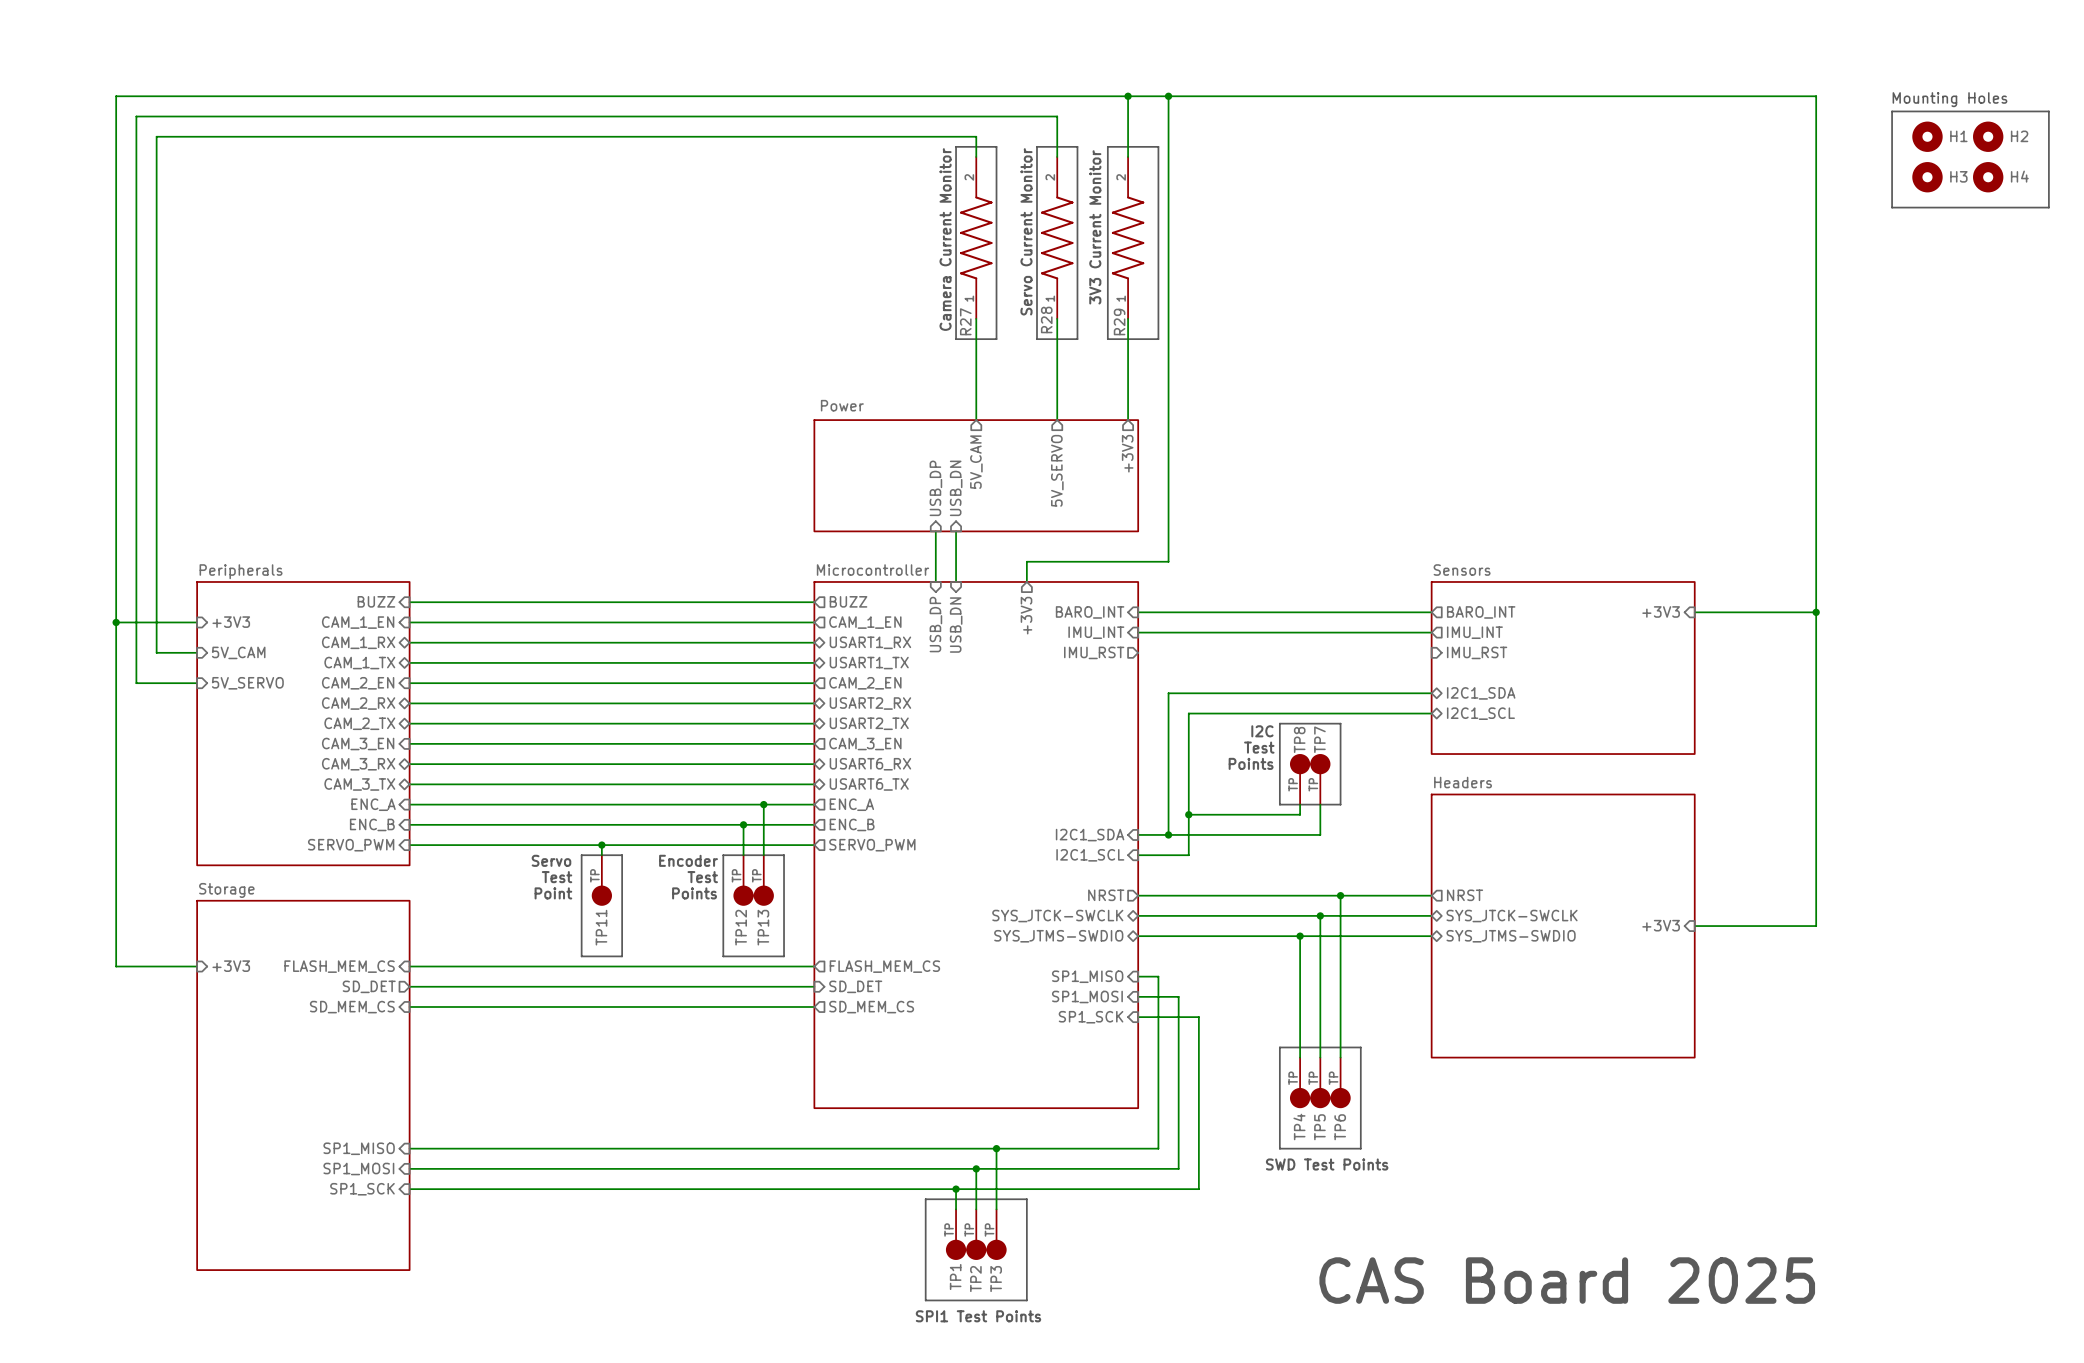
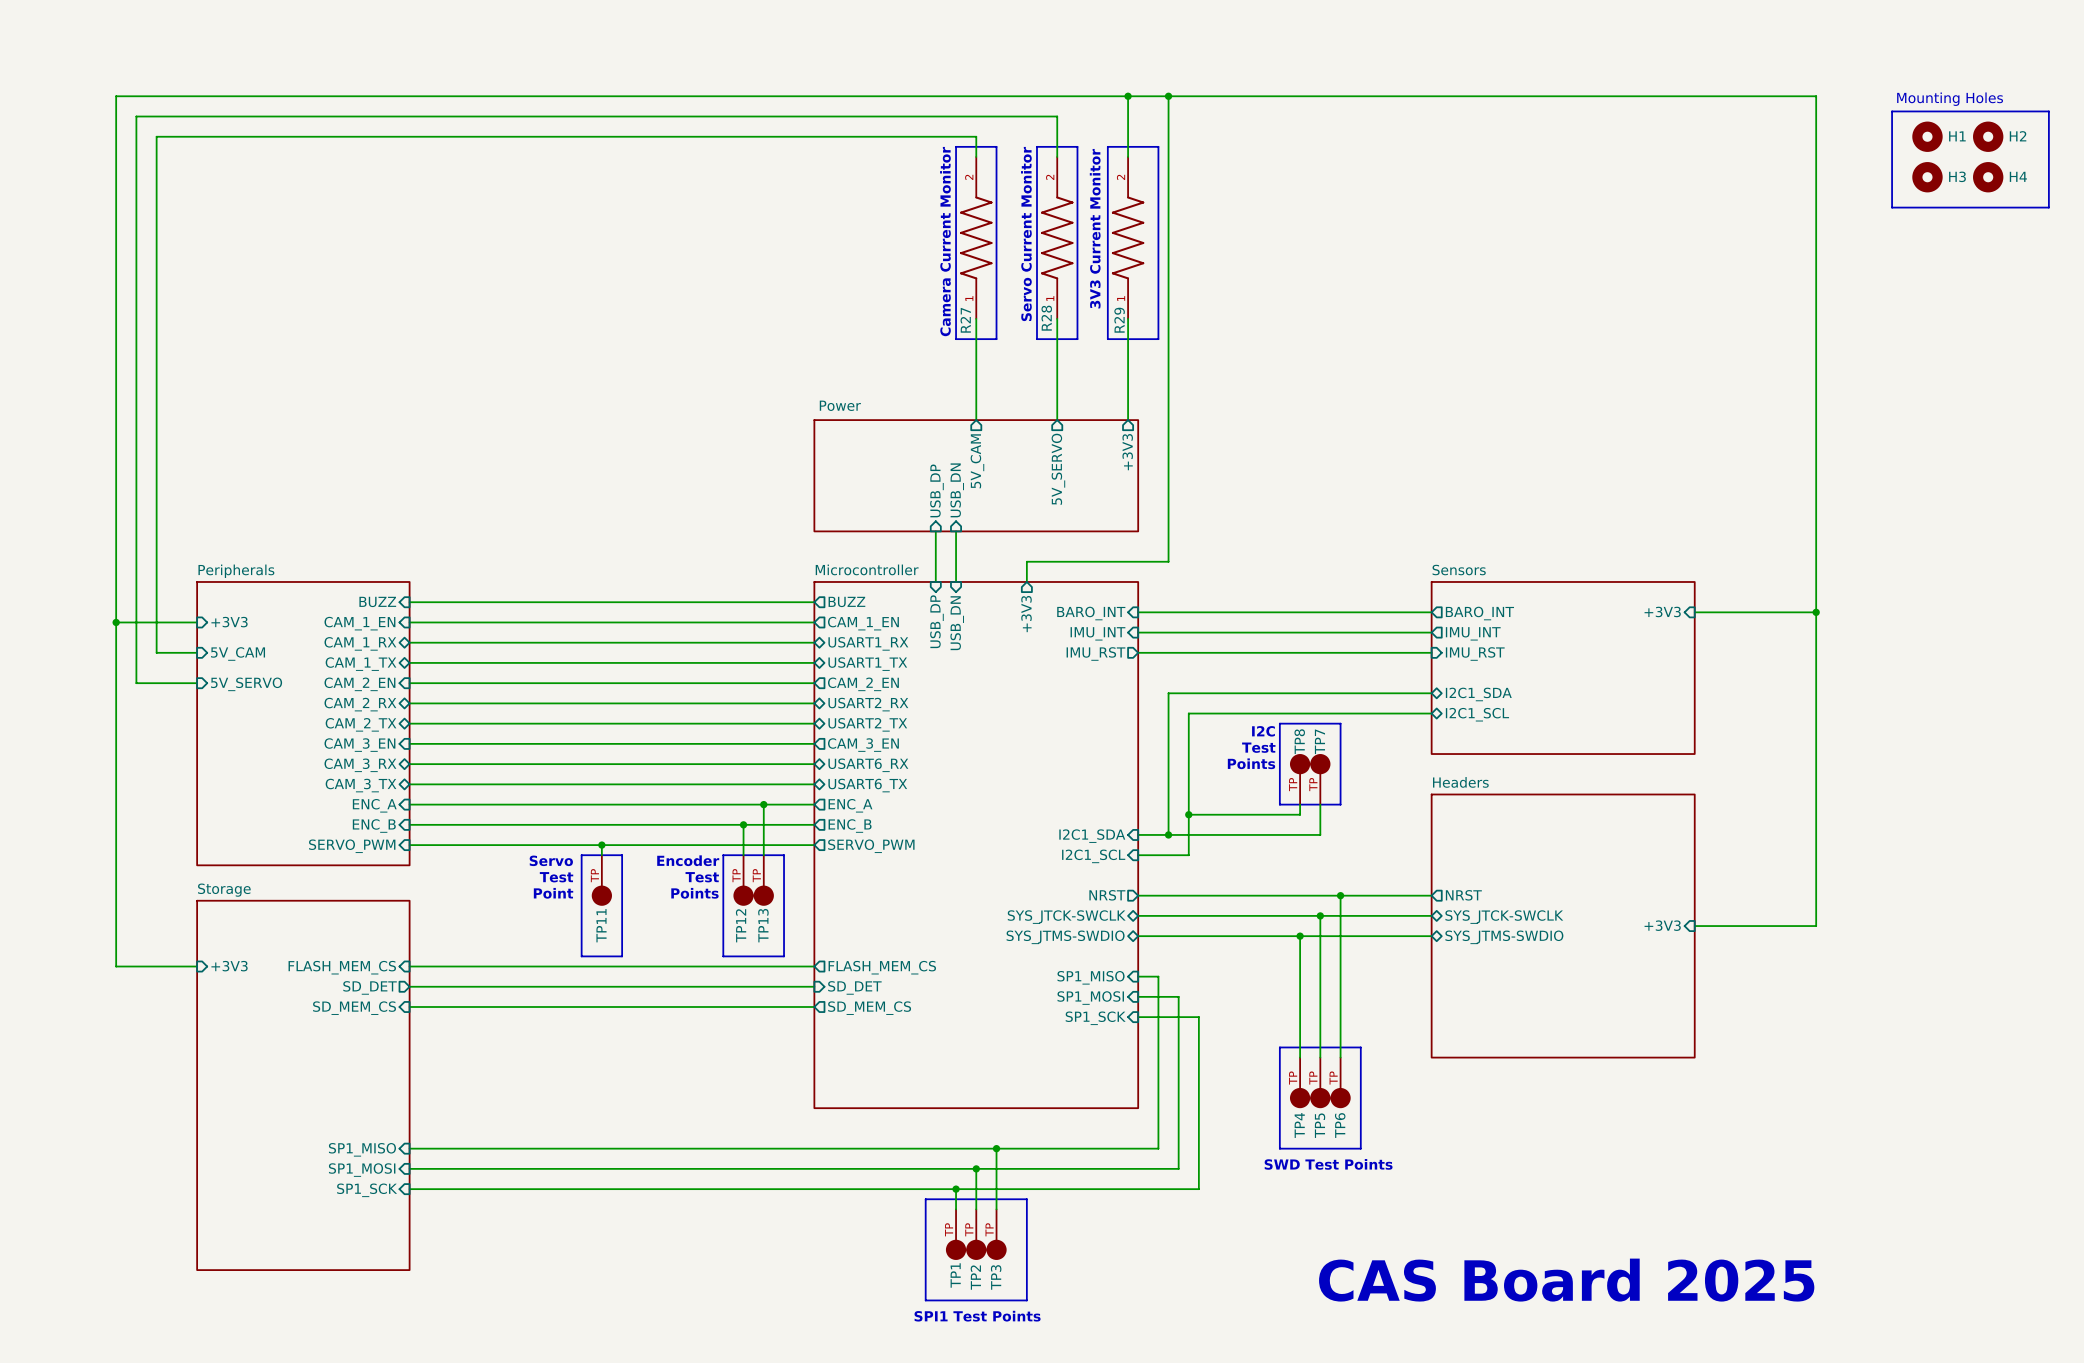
wire: none -> (1138, 652) (1431, 652)

